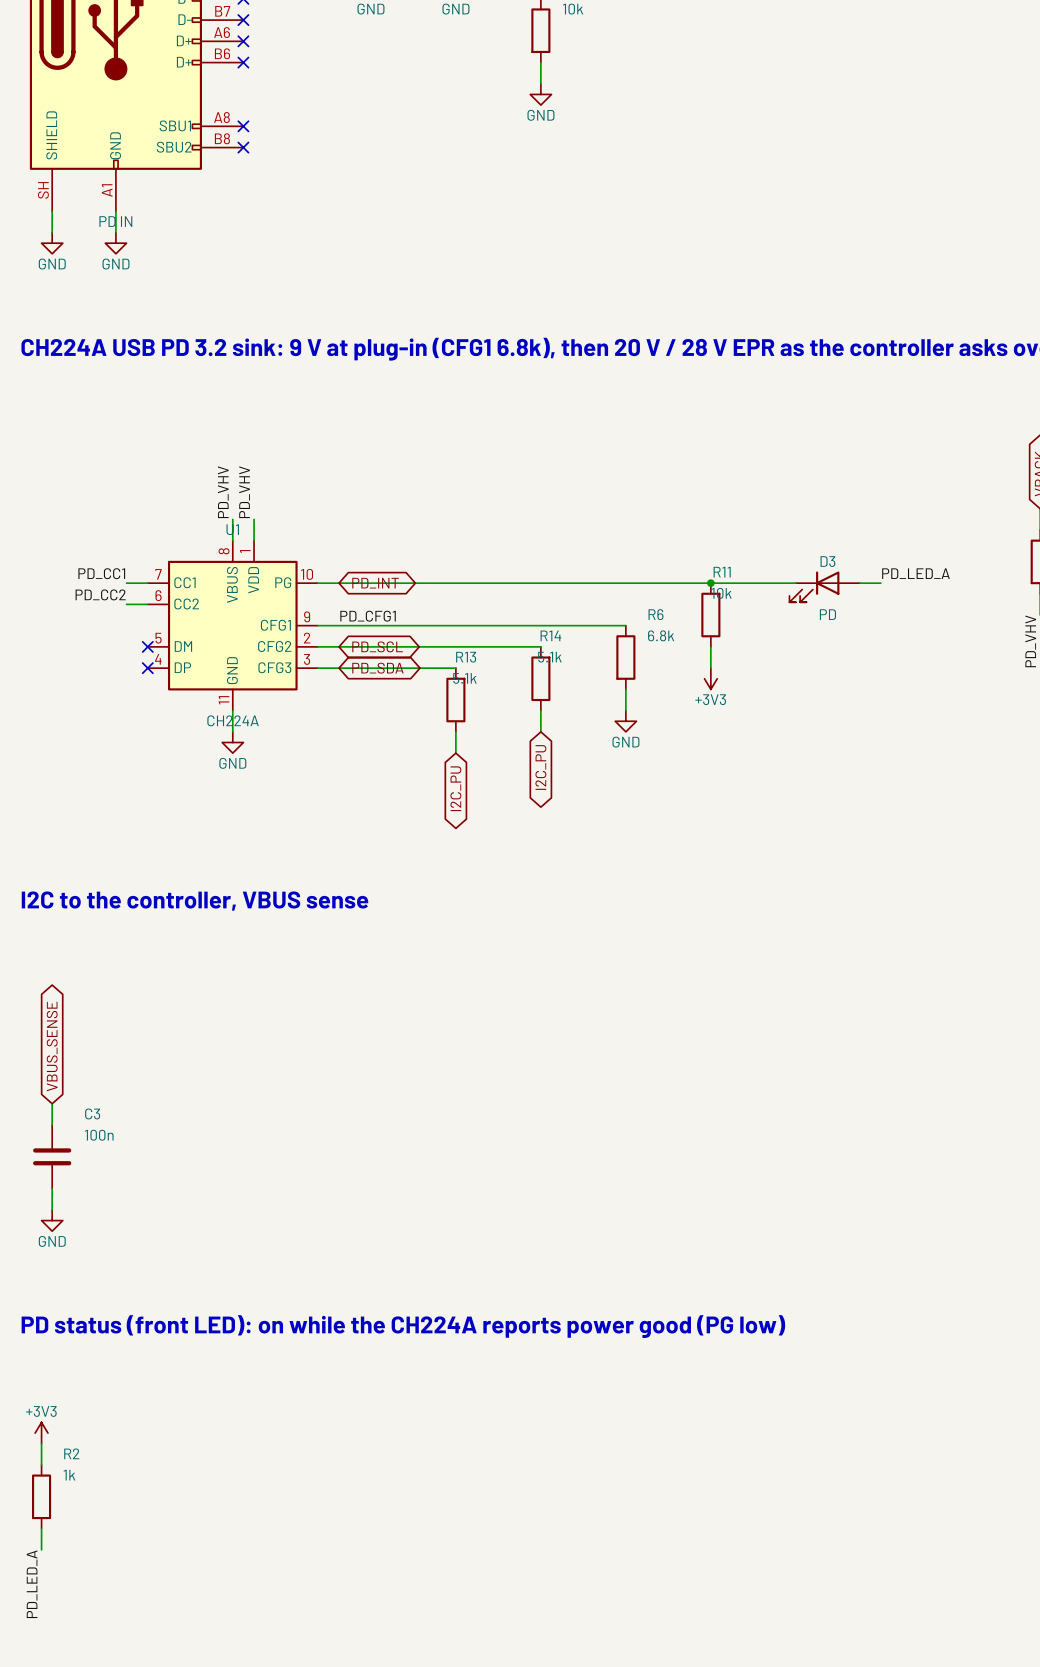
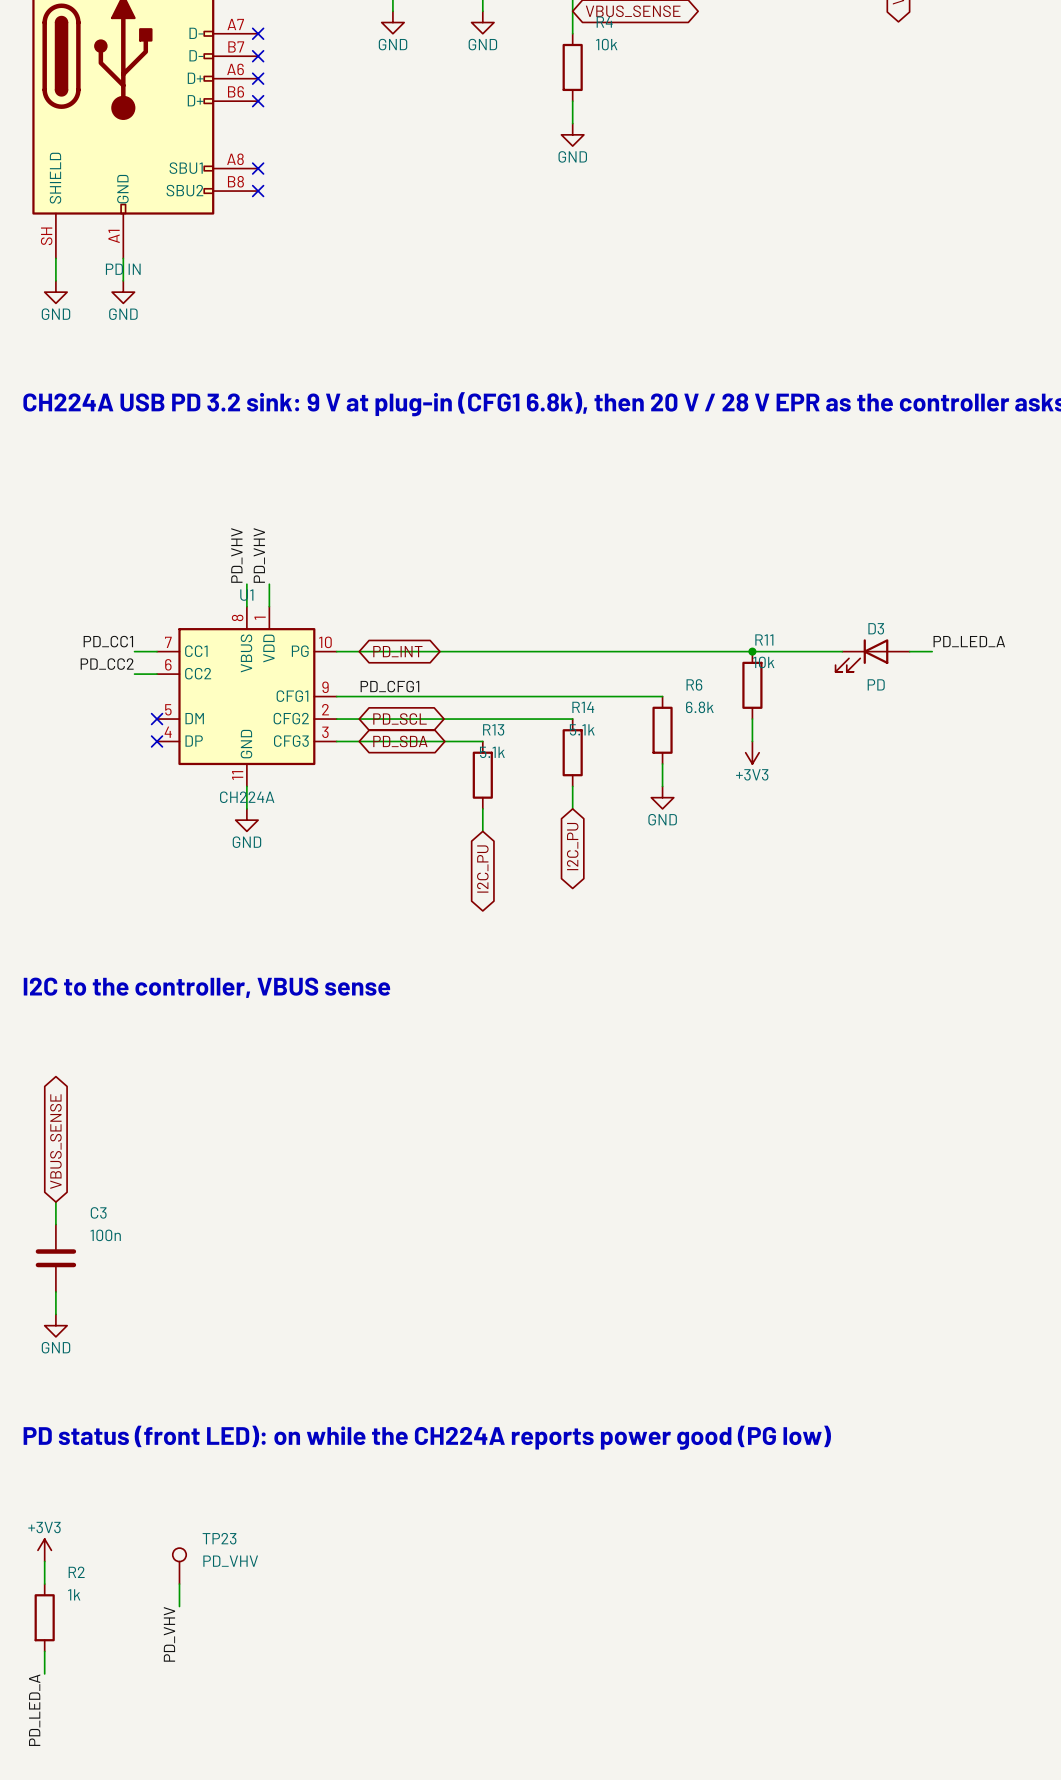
TP23: none -> PD_VHV (179, 1566)
wire: none -> (179, 1584) (179, 1606)
label: none -> PD_VHV (169, 1634)

